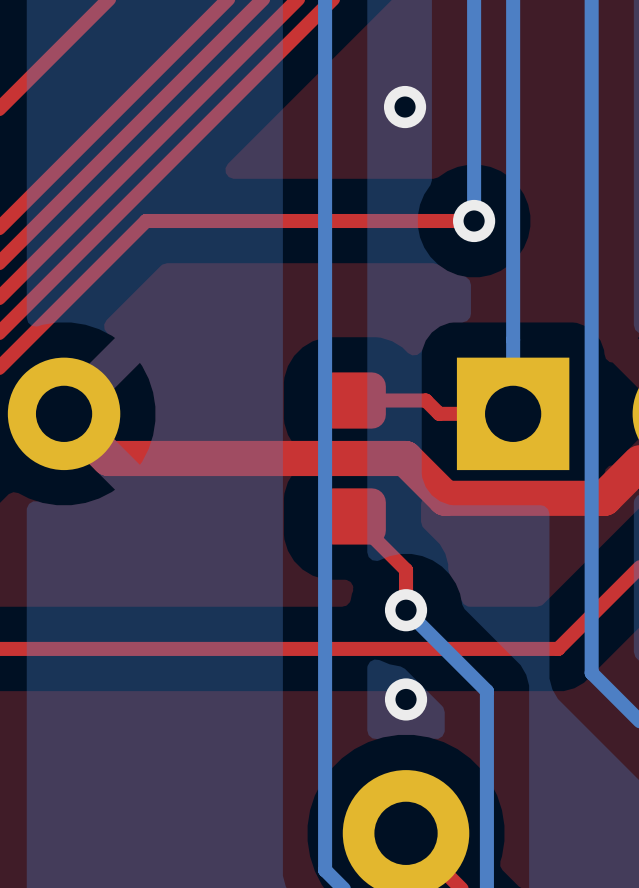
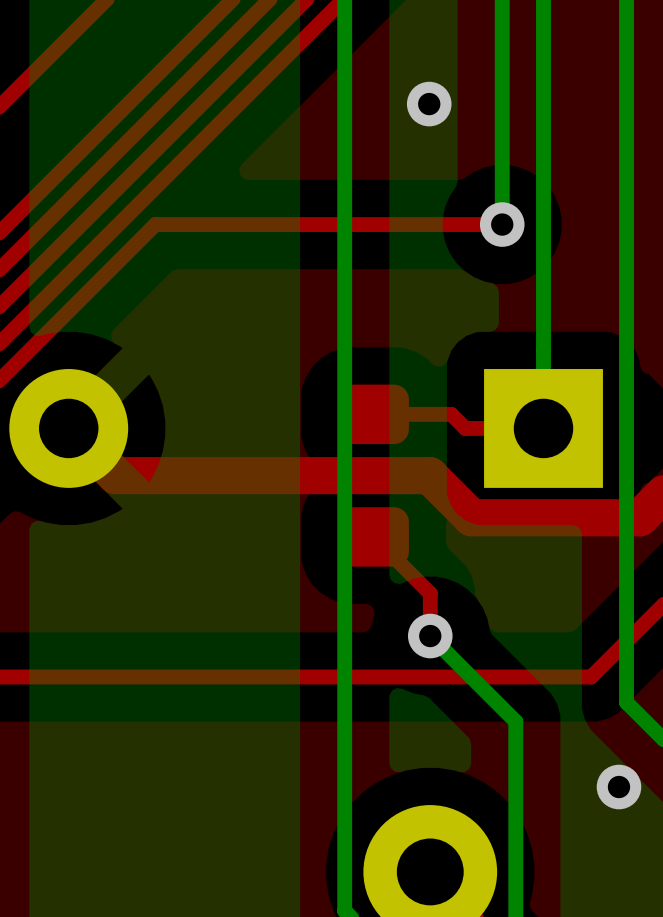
via position: (406, 699) -> (618, 787)

